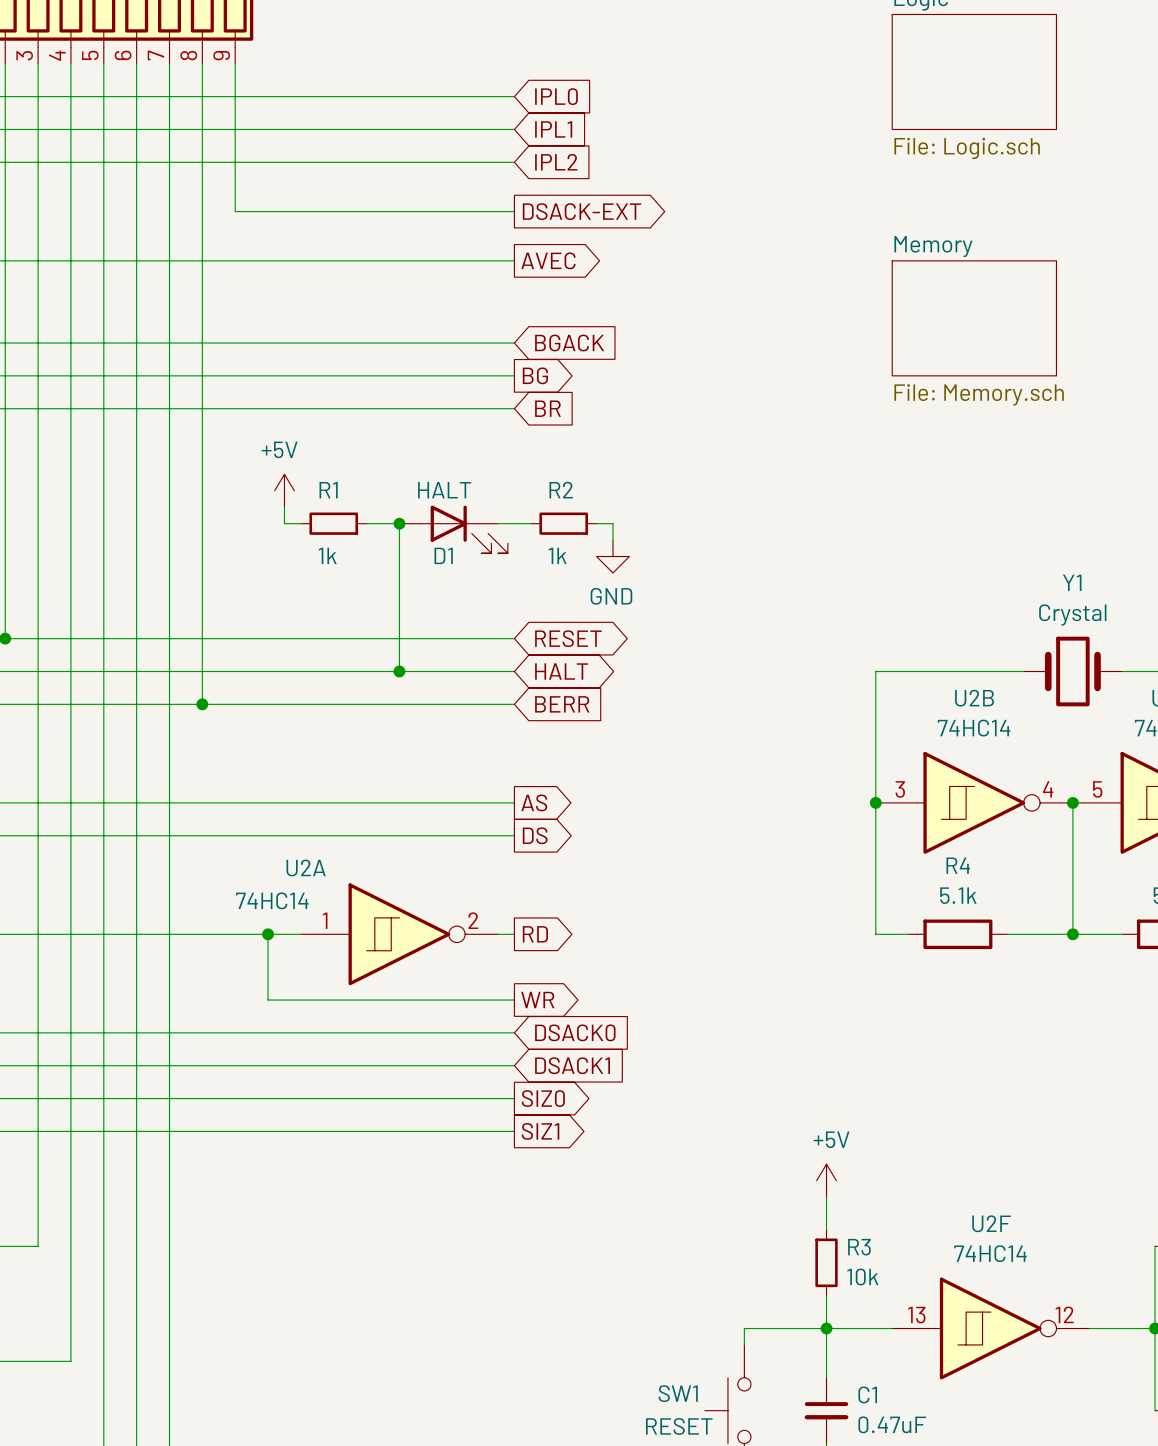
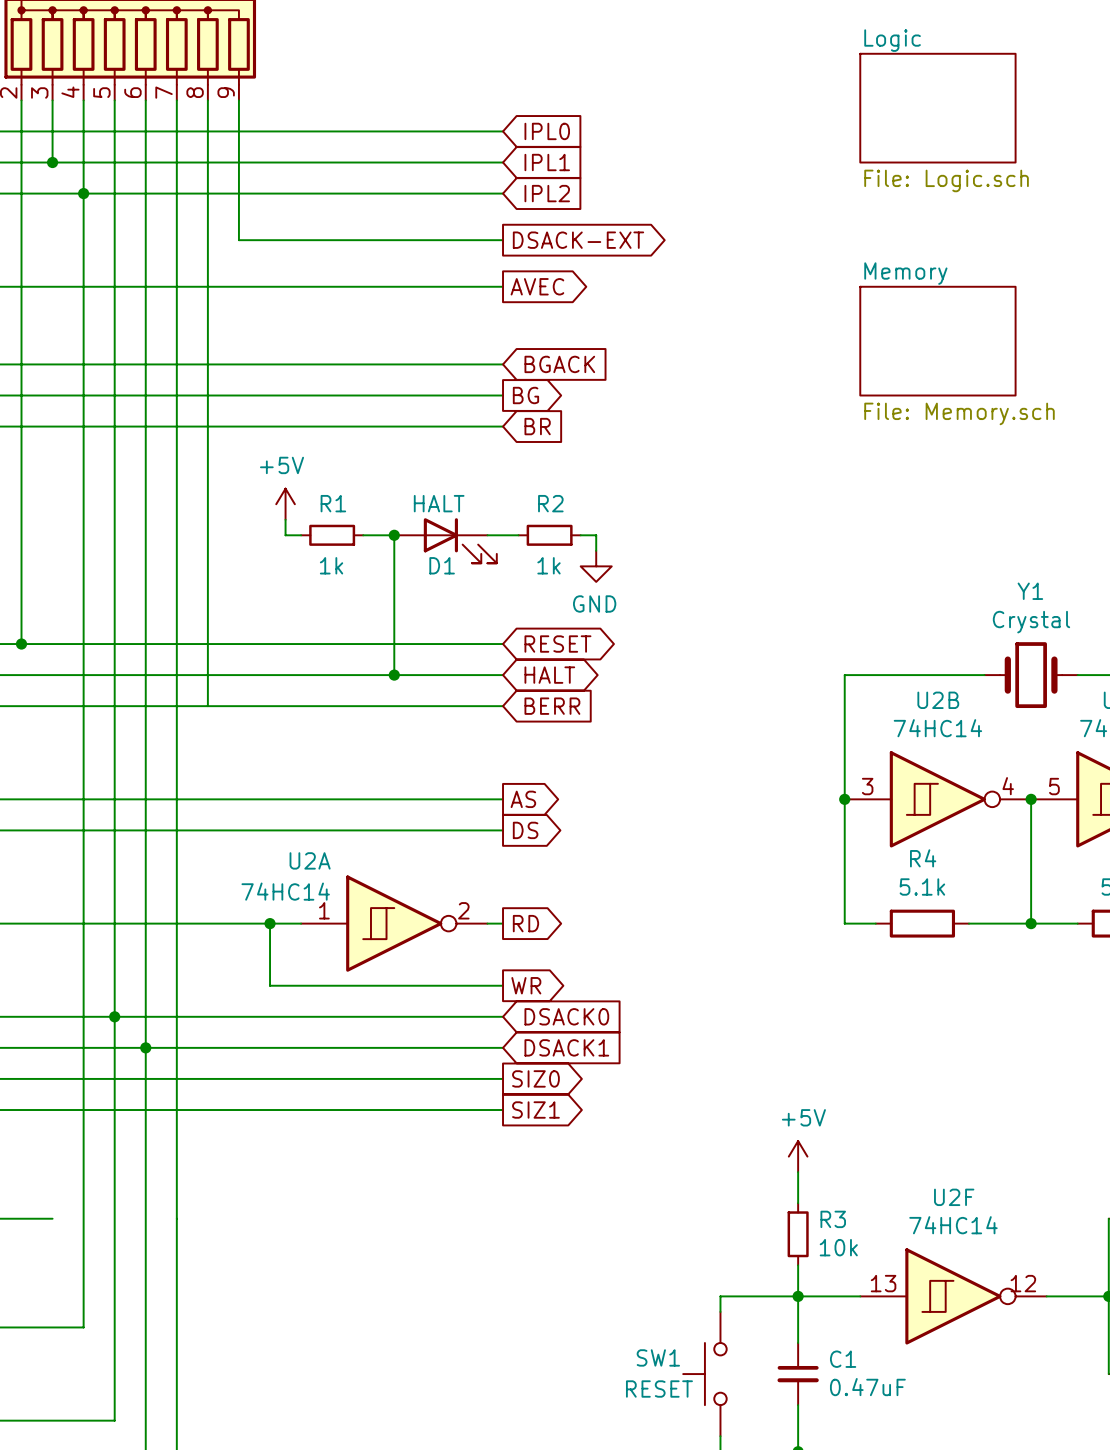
wire: (38, 129) (38, 1246) -> none
junction: none -> (52, 162)
junction: none -> (83, 193)
junction: (202, 704) -> none
junction: none -> (114, 1016)
junction: none -> (145, 1047)

